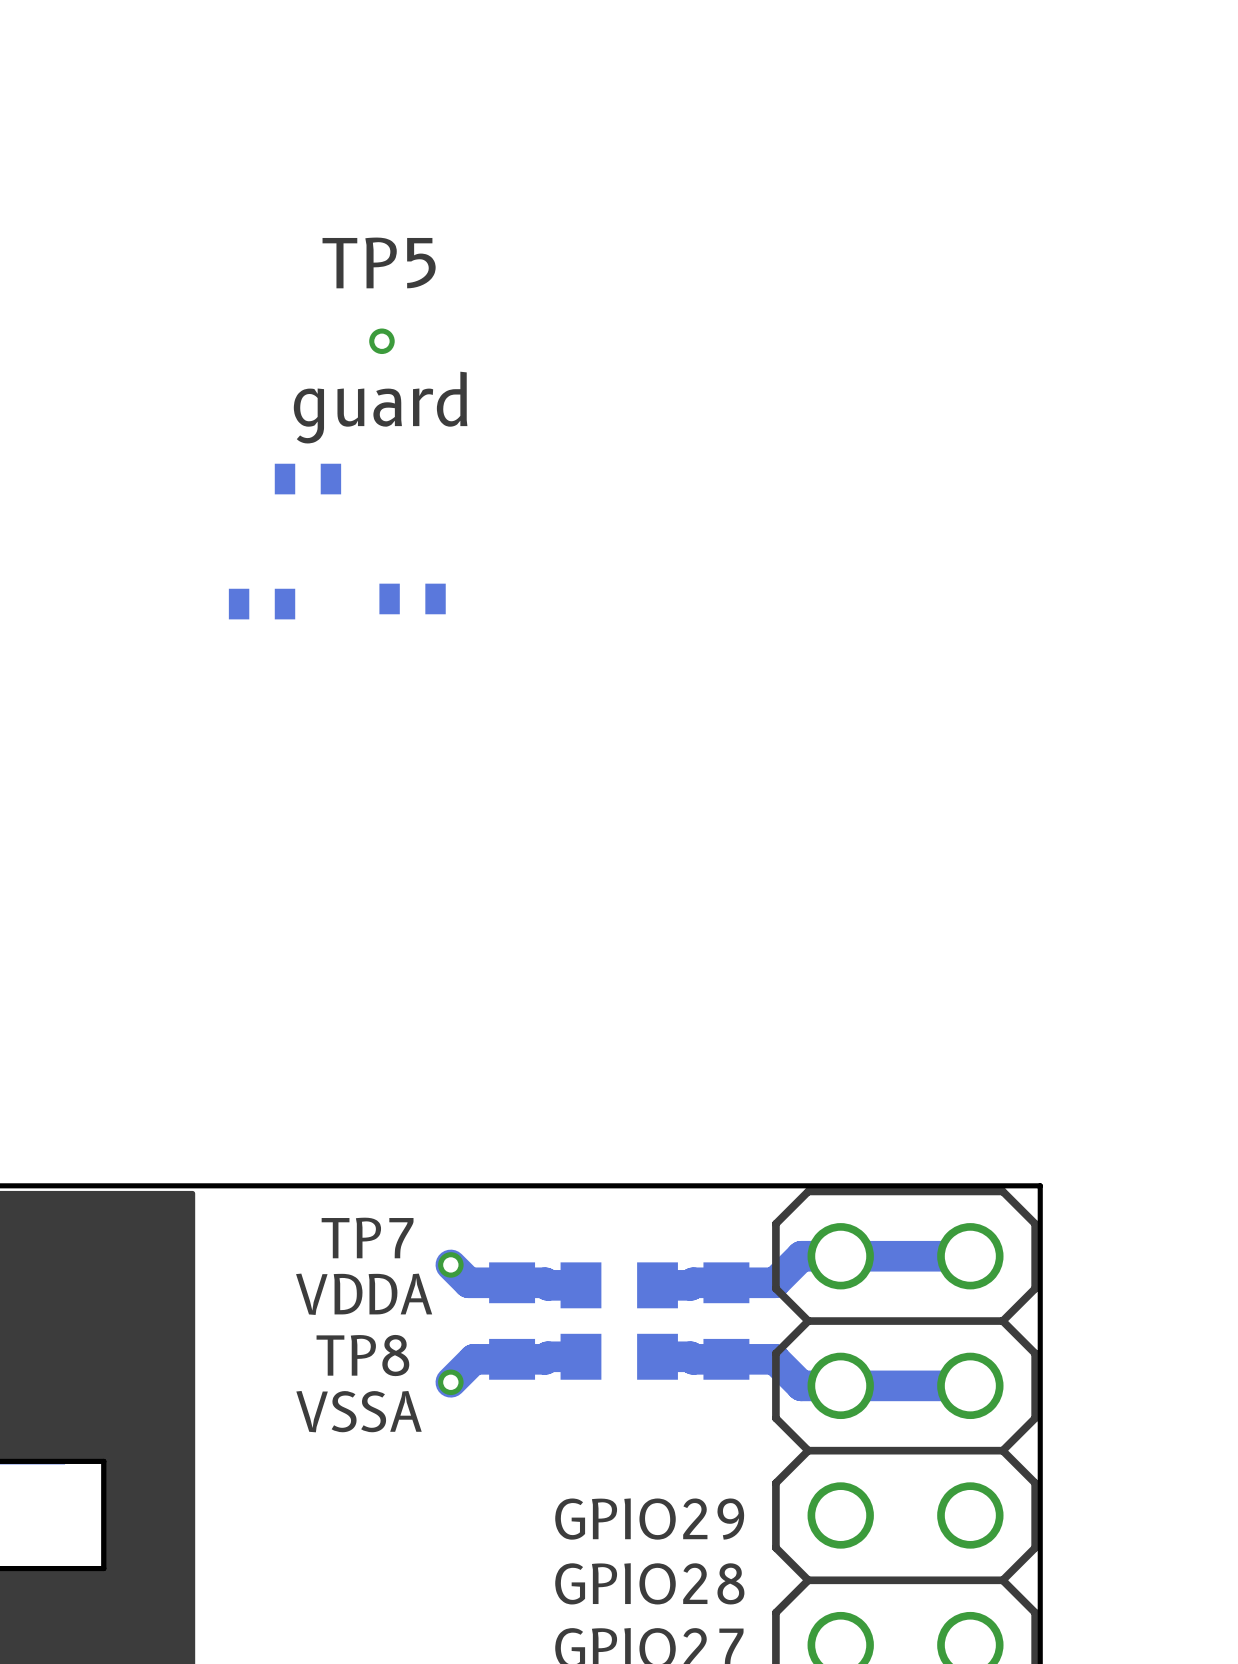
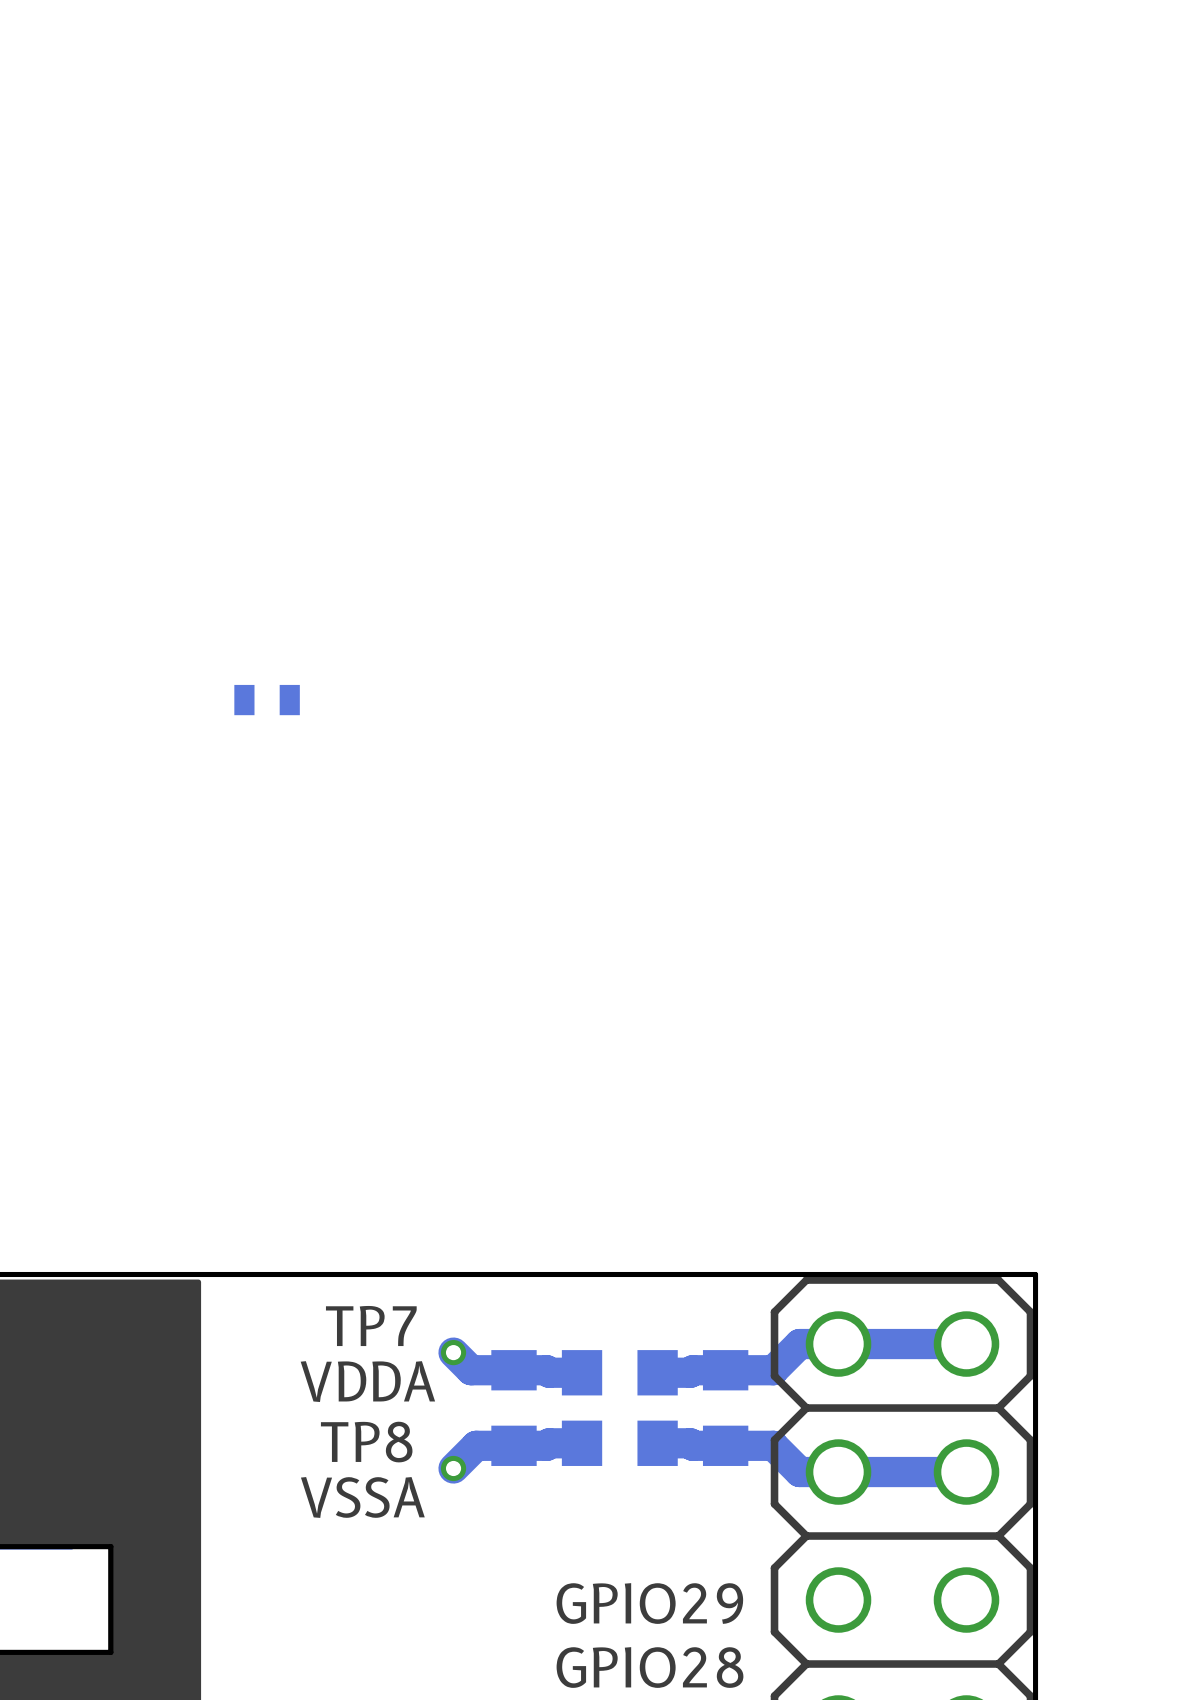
TP5: guard (381, 341) -> none
part: (307, 479) -> none
part: (412, 598) -> none

